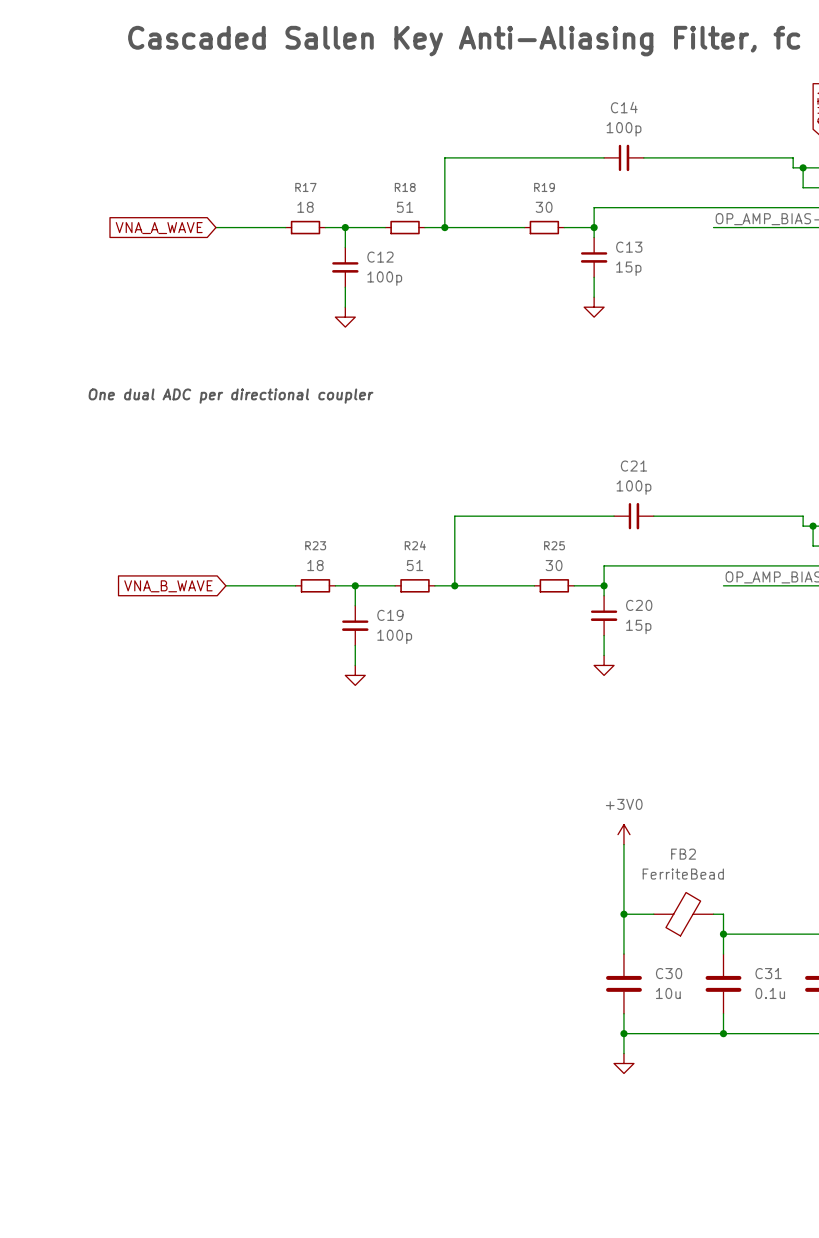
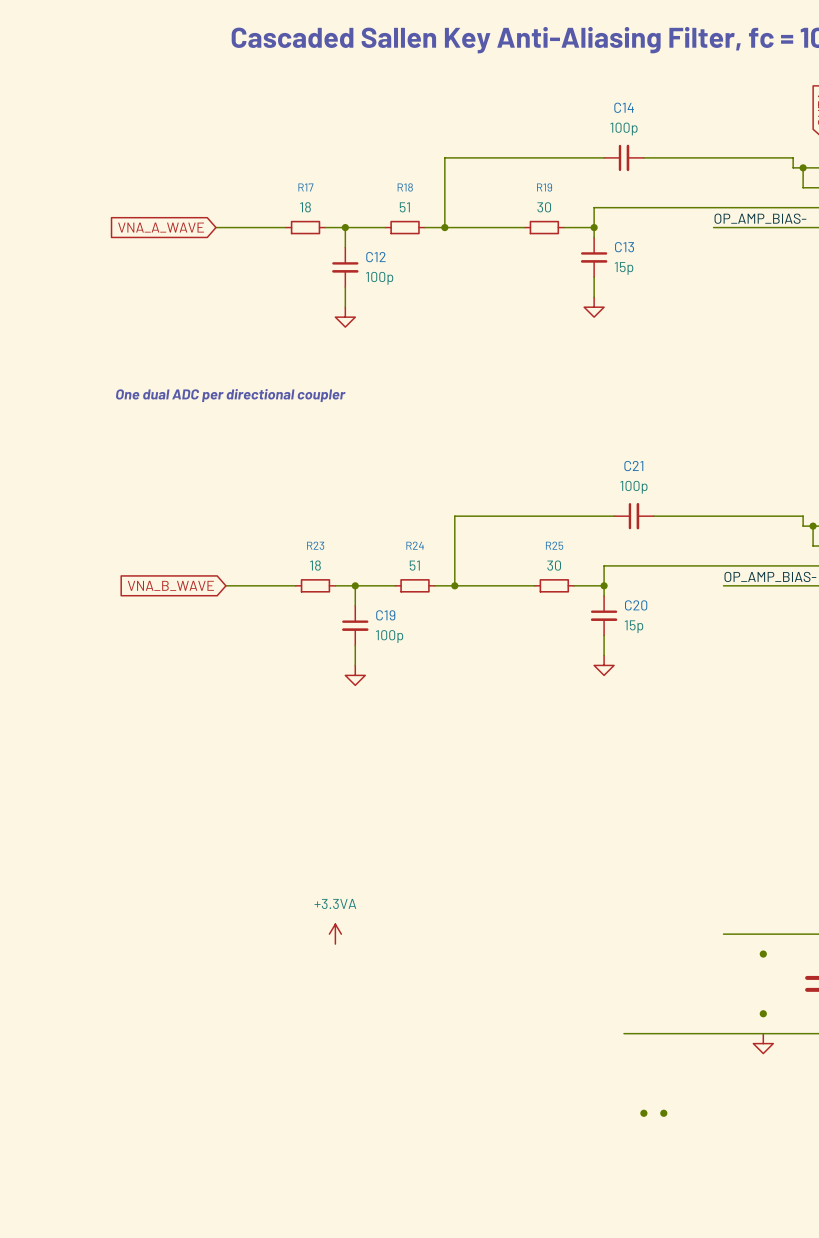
power symbol: +3V0 (623, 834) -> none
wire: (623, 844) (623, 954) -> none
wire: (623, 914) (653, 914) -> none
junction: (623, 914) -> none
FB2: FerriteBead (683, 914) -> none
wire: (713, 914) (723, 914) (723, 954) -> none
power symbol: none -> +3.3VA (335, 934)
junction: (723, 934) -> none
junction: none -> (763, 954)
C30: 10u (623, 983) -> none
C31: 0.1u (723, 983) -> none
wire: (623, 1013) (623, 1053) -> none
wire: (723, 1013) (723, 1033) -> none
junction: none -> (763, 1013)
junction: (623, 1033) -> none
junction: (723, 1033) -> none
power symbol position: (623, 1063) -> (763, 1043)
junction: none -> (643, 1113)
junction: none -> (663, 1113)

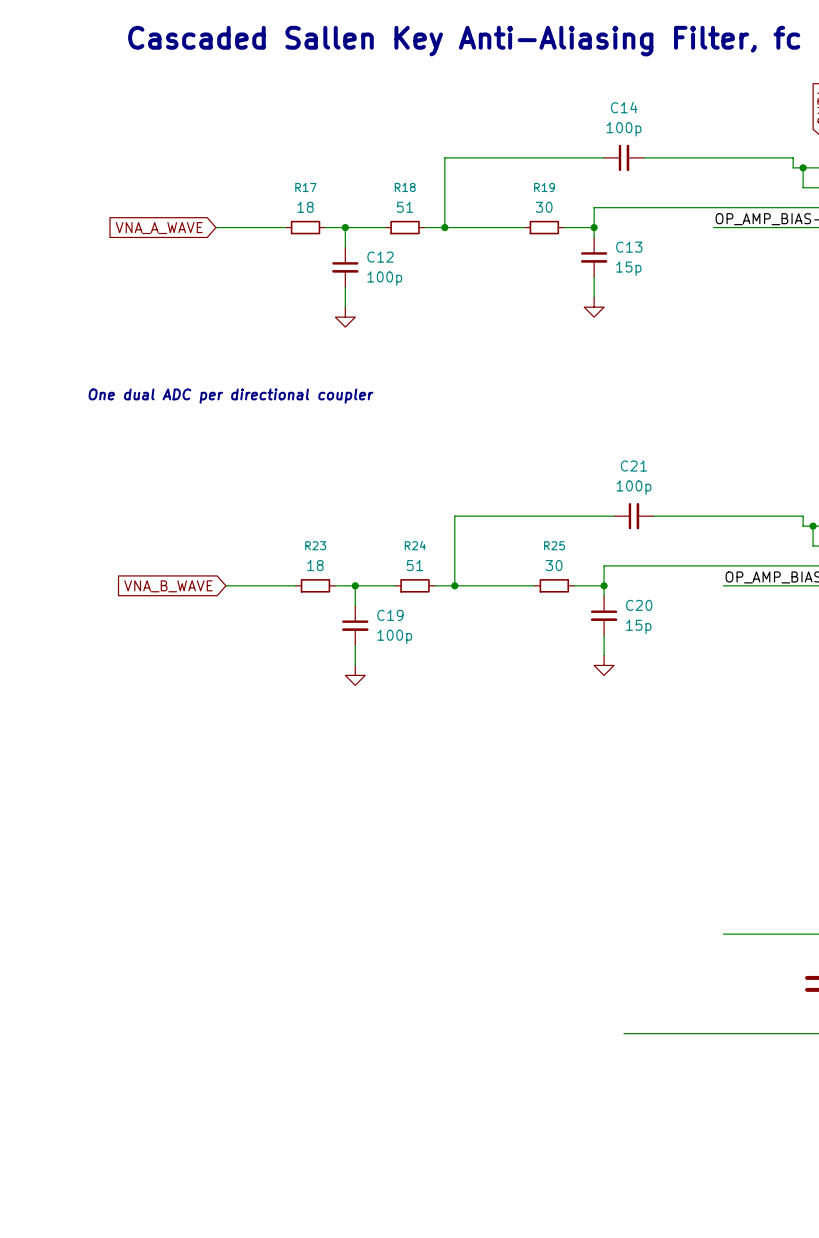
power symbol: +3.3VA (335, 934) -> none
junction: (763, 954) -> none
junction: (763, 1013) -> none
power symbol: (763, 1043) -> none
junction: (643, 1113) -> none
junction: (663, 1113) -> none

